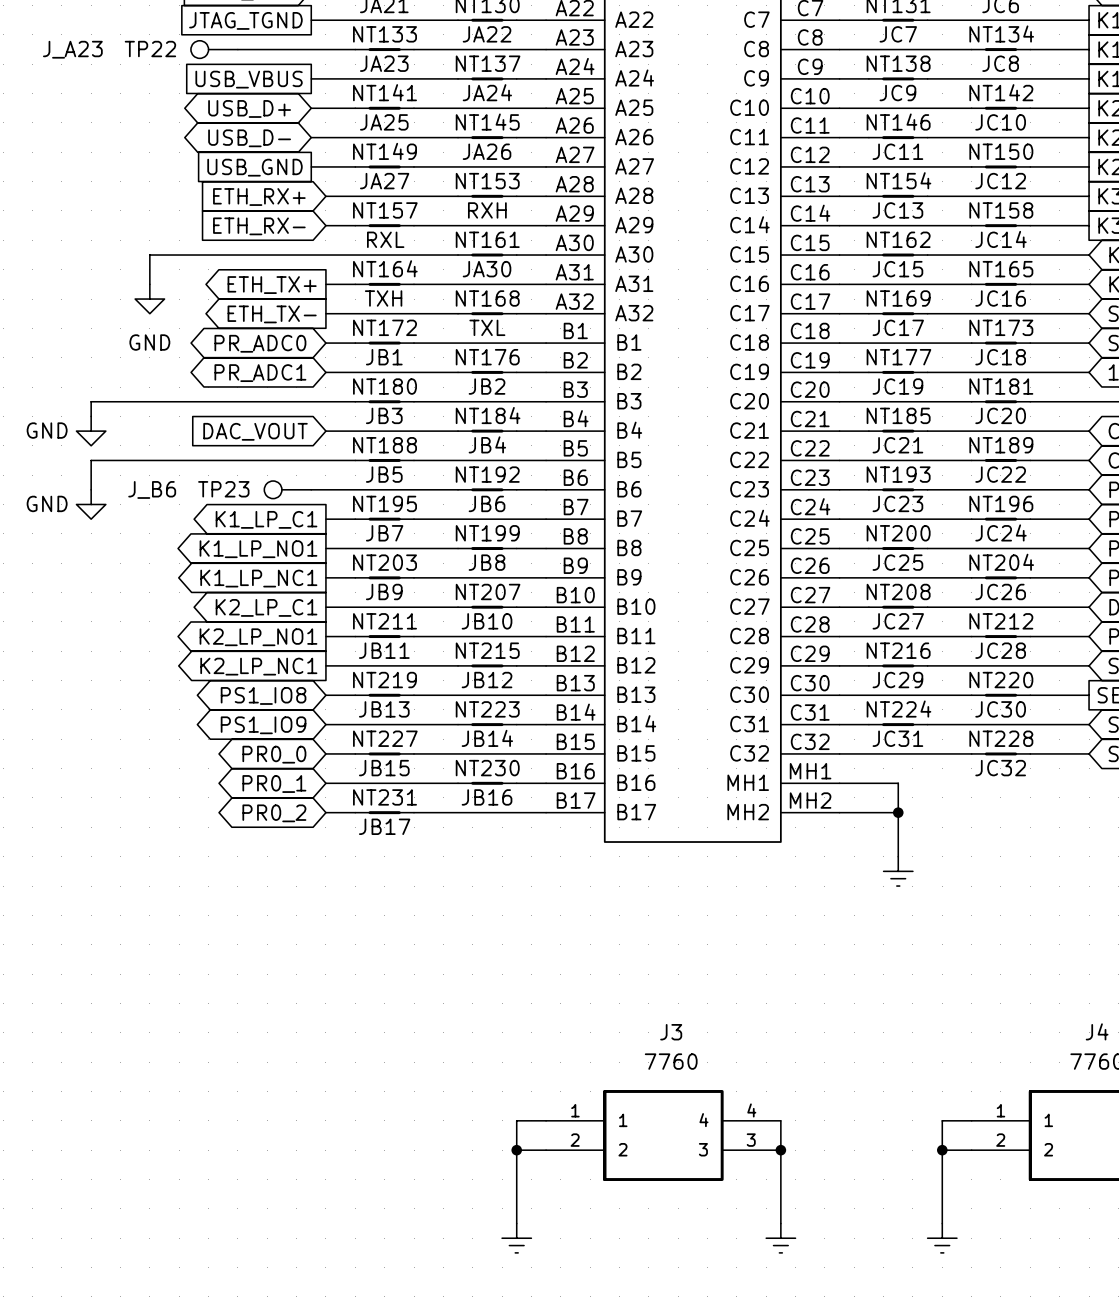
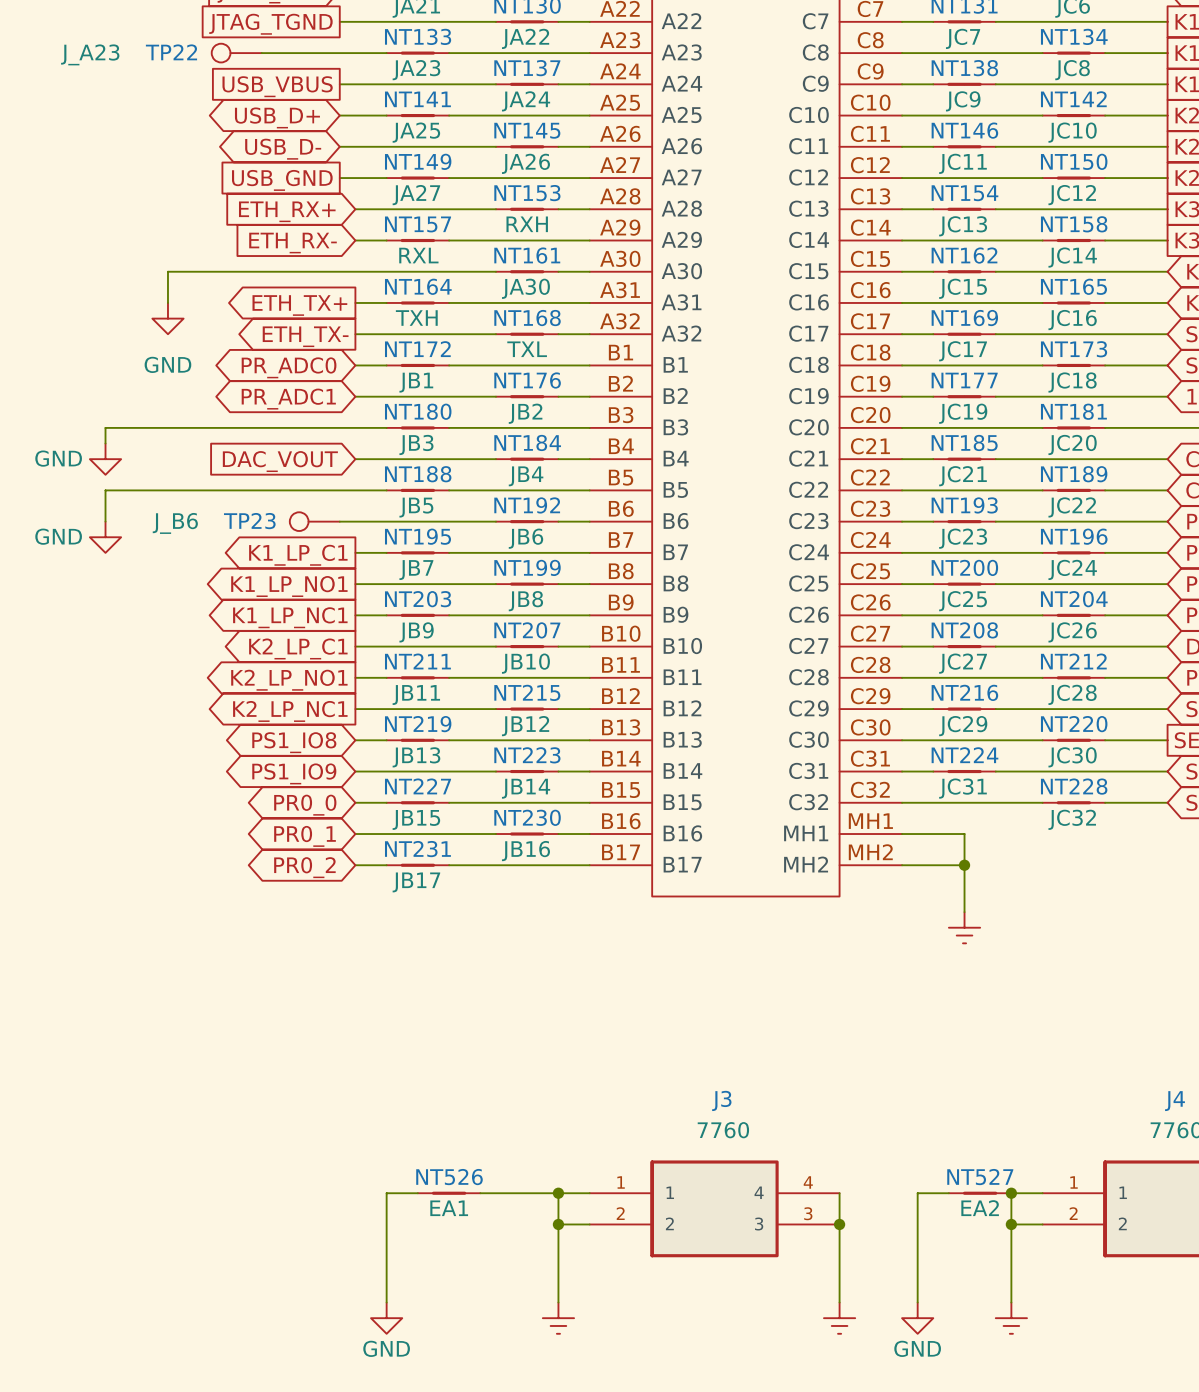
wire: none -> (417, 1193) (386, 1193) (386, 1302)
NT526: none -> EA1 (449, 1193)
wire: none -> (480, 1193) (558, 1193)
junction: none -> (558, 1193)
wire: none -> (948, 1193) (917, 1193) (917, 1302)
NT527: none -> EA2 (980, 1193)
junction: none -> (1011, 1193)
power symbol: none -> GND (386, 1318)
power symbol: none -> GND (917, 1318)

